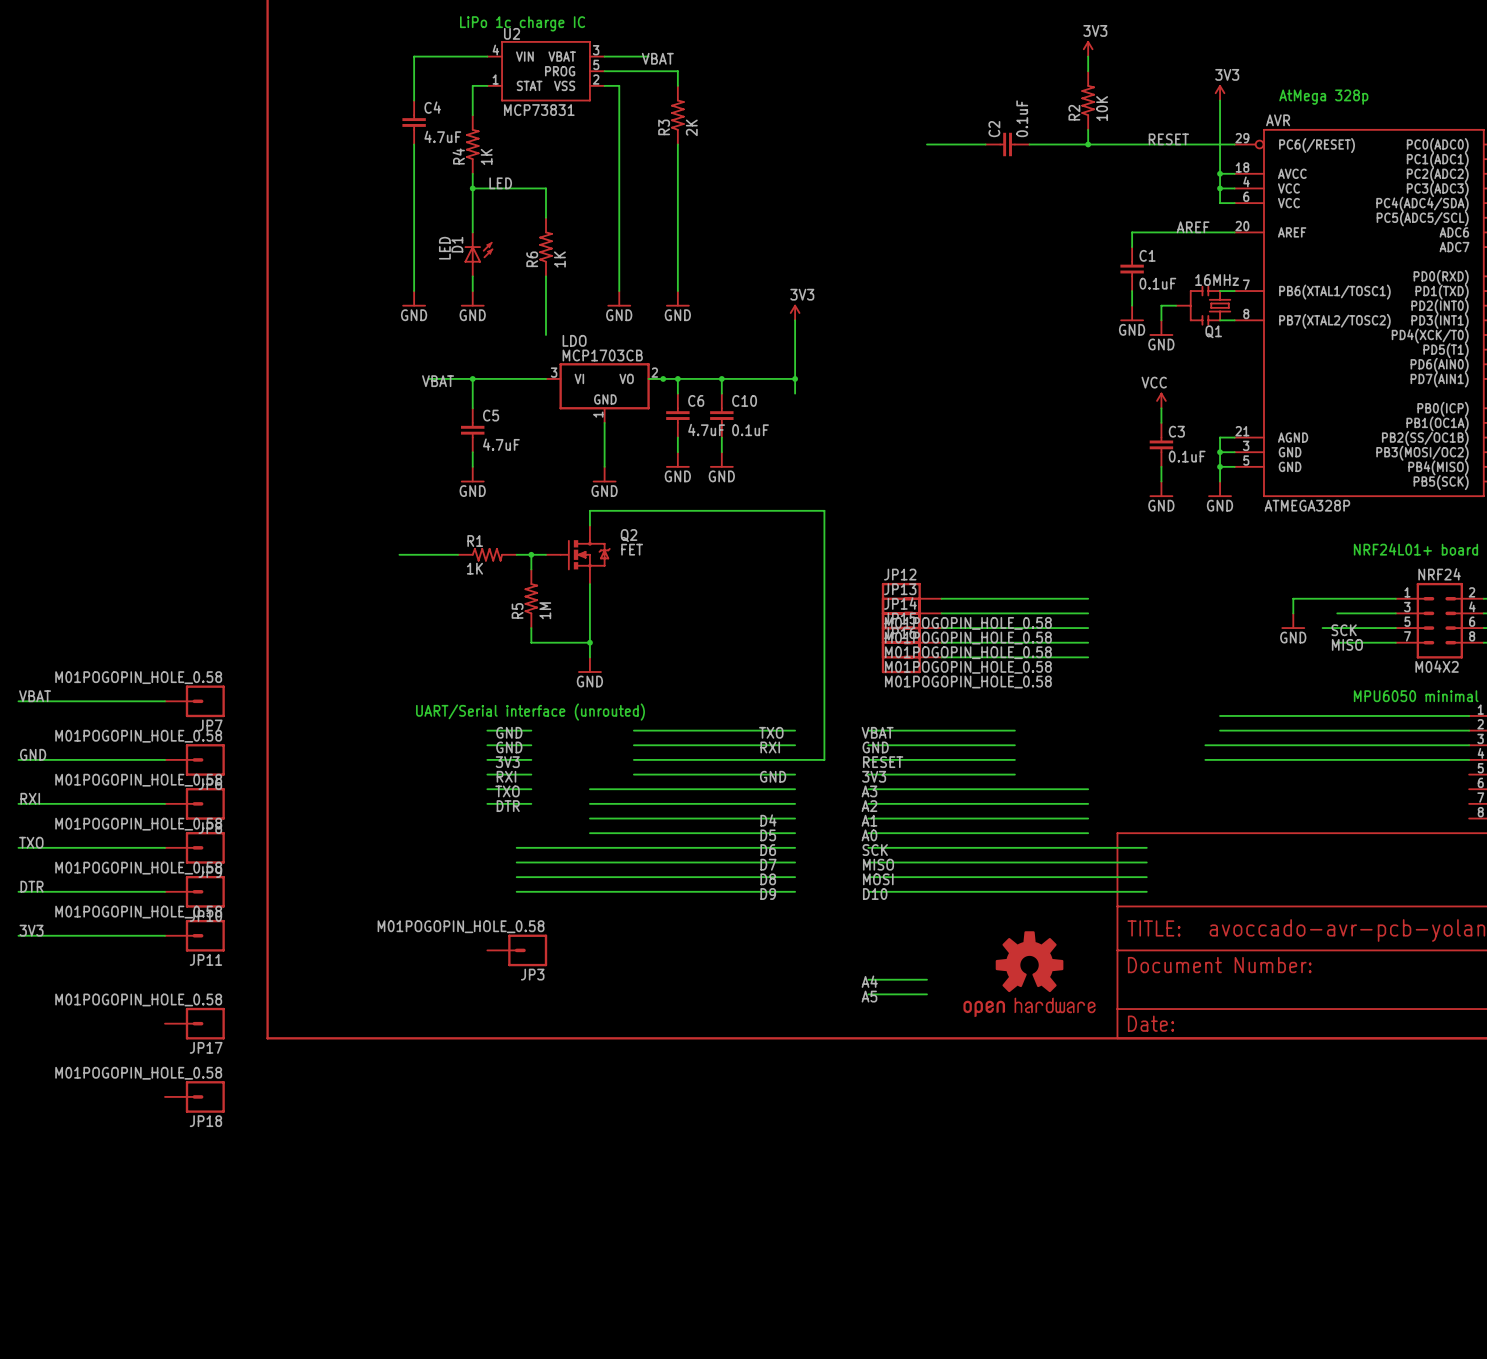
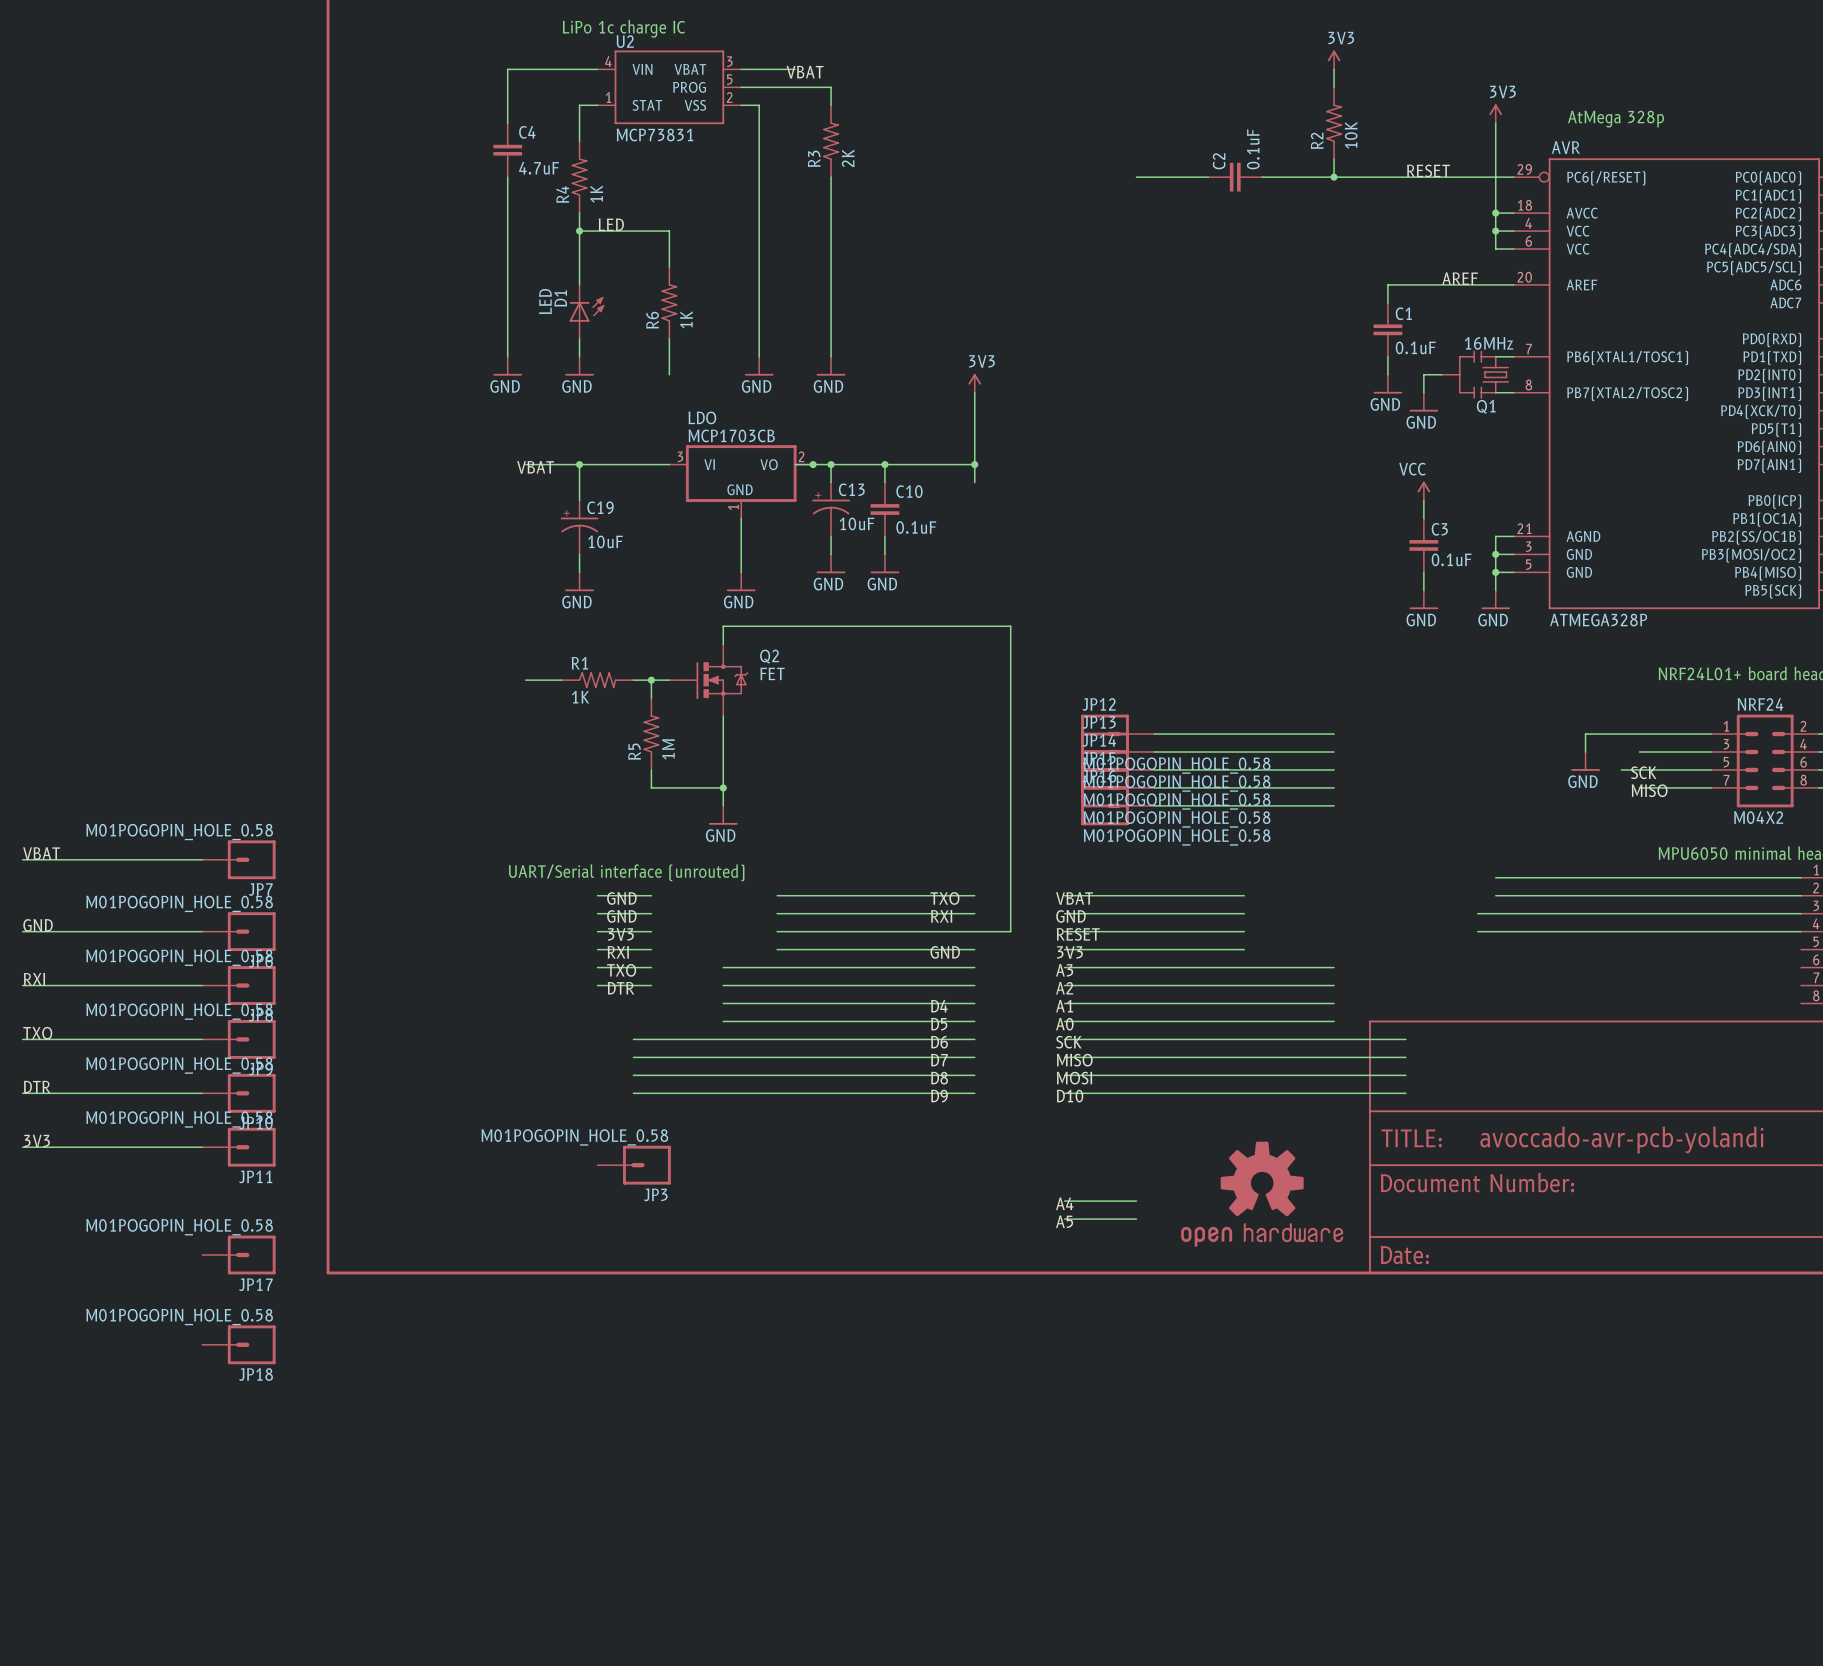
wire: (546, 305) (546, 334) -> none
C6: 4.7uF (677, 415) -> none
C13: none -> 10uF (831, 509)
C5: 4.7uF (472, 430) -> none
C19: none -> 10uF (579, 527)
wire: (399, 554) (428, 554) -> none

